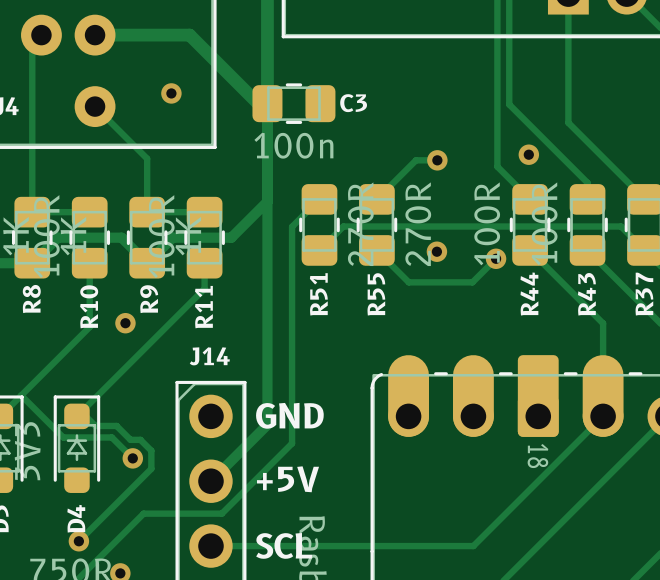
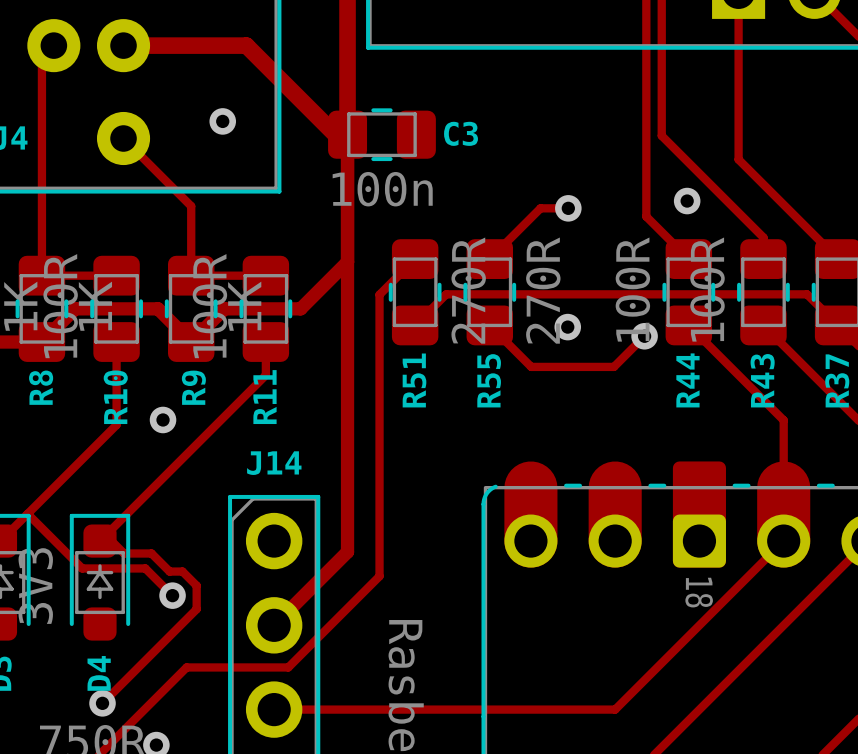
text: GND (289, 415) -> none
text: +5V (288, 479) -> none
text: SCL (284, 545) -> none

